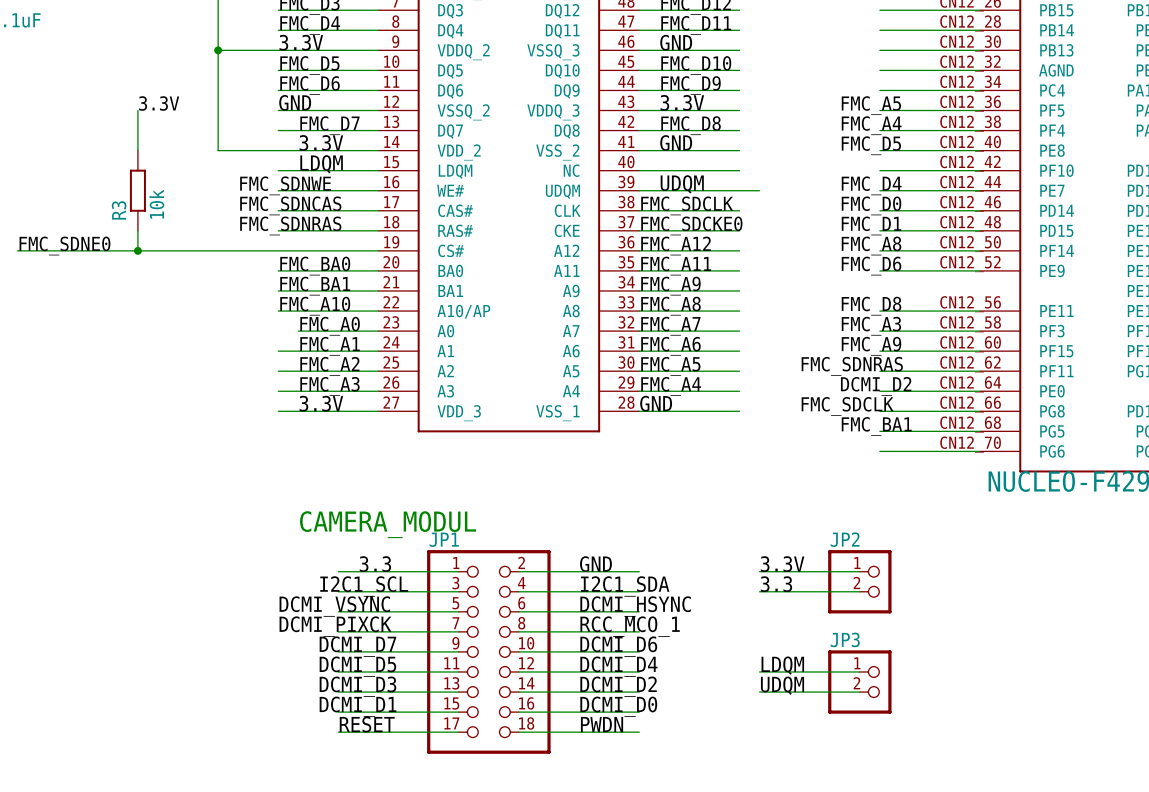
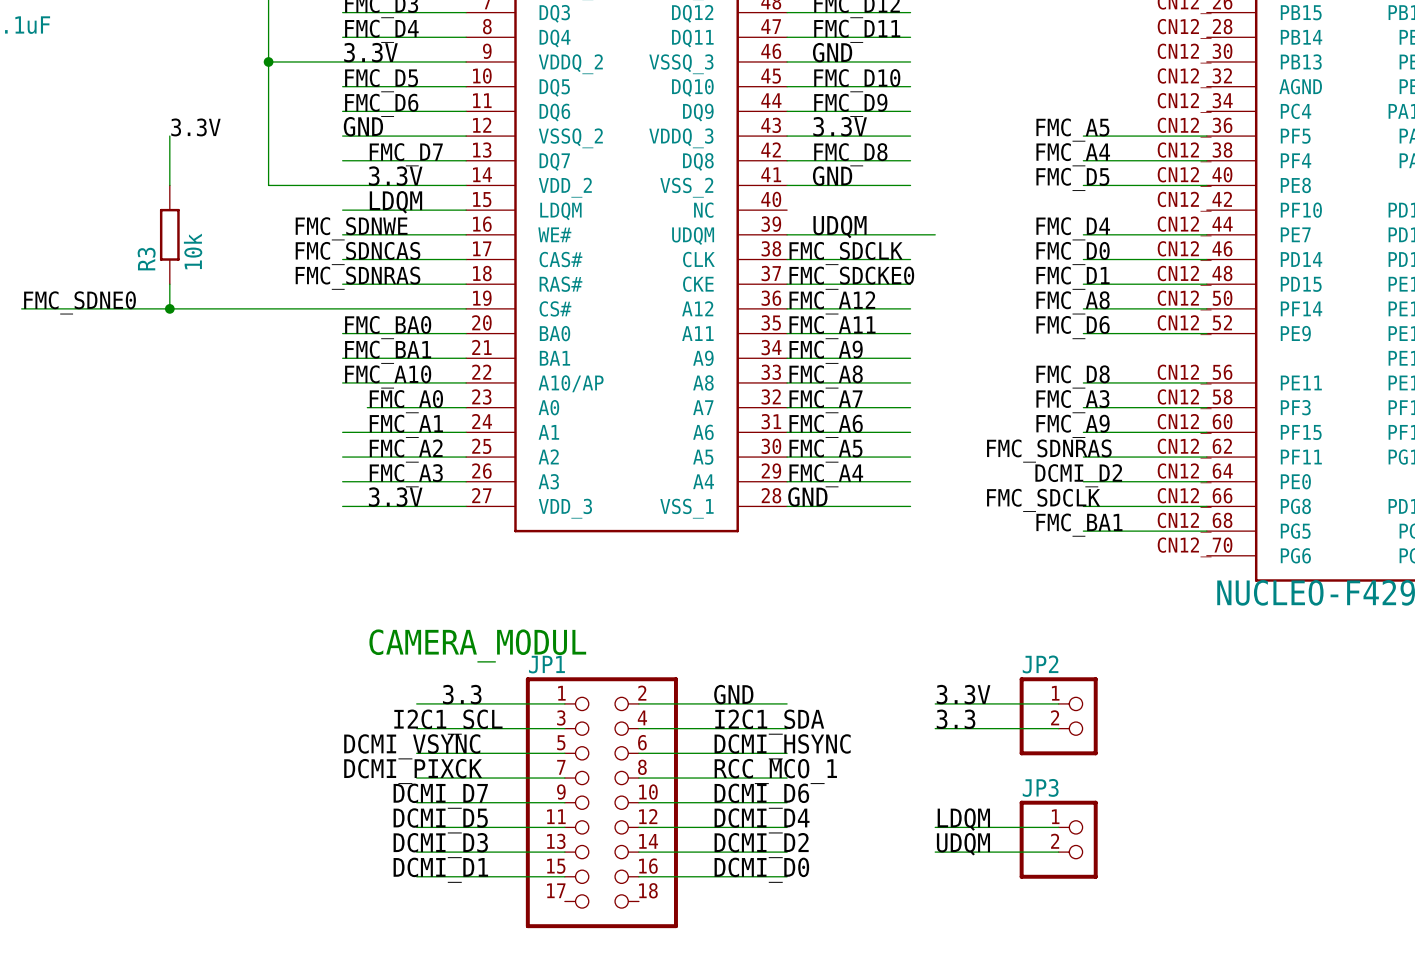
wire: (879, 10) (980, 10) -> none
wire: (879, 30) (980, 30) -> none
wire: (879, 50) (980, 50) -> none
wire: (879, 70) (980, 70) -> none
wire: (879, 90) (980, 90) -> none
wire: (639, 170) (739, 170) -> none
wire: (879, 170) (980, 170) -> none
wire: (879, 451) (980, 451) -> none
label: RESET (367, 724) -> none
label: PWDN (602, 724) -> none
wire: (338, 732) (458, 732) -> none
wire: (518, 732) (639, 732) -> none

